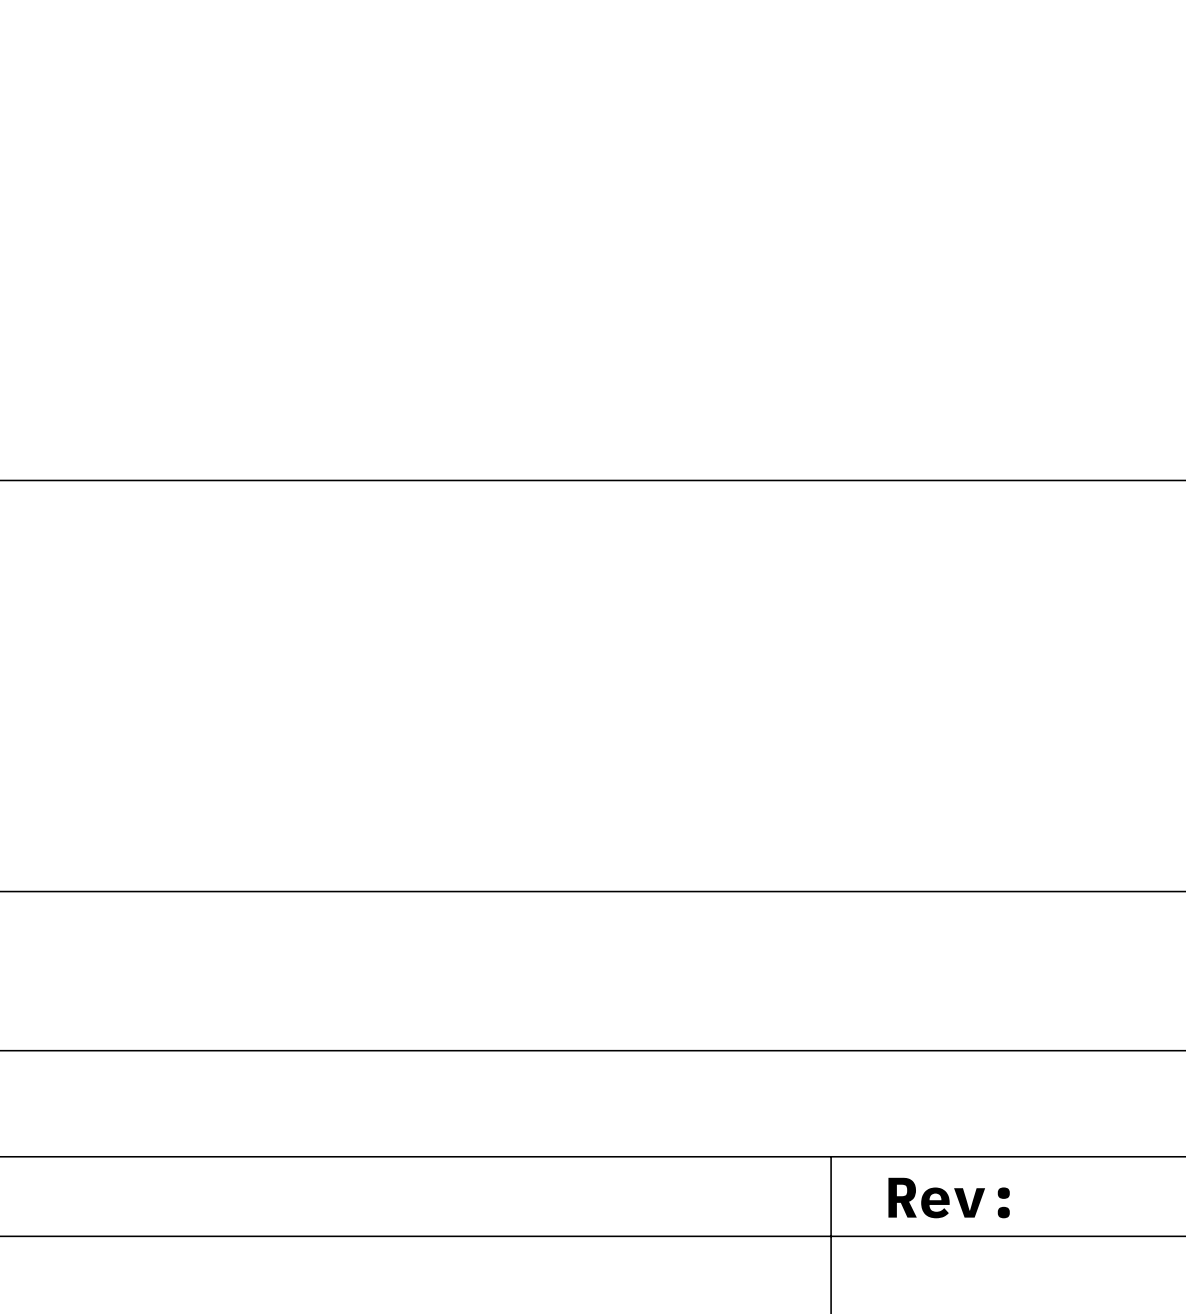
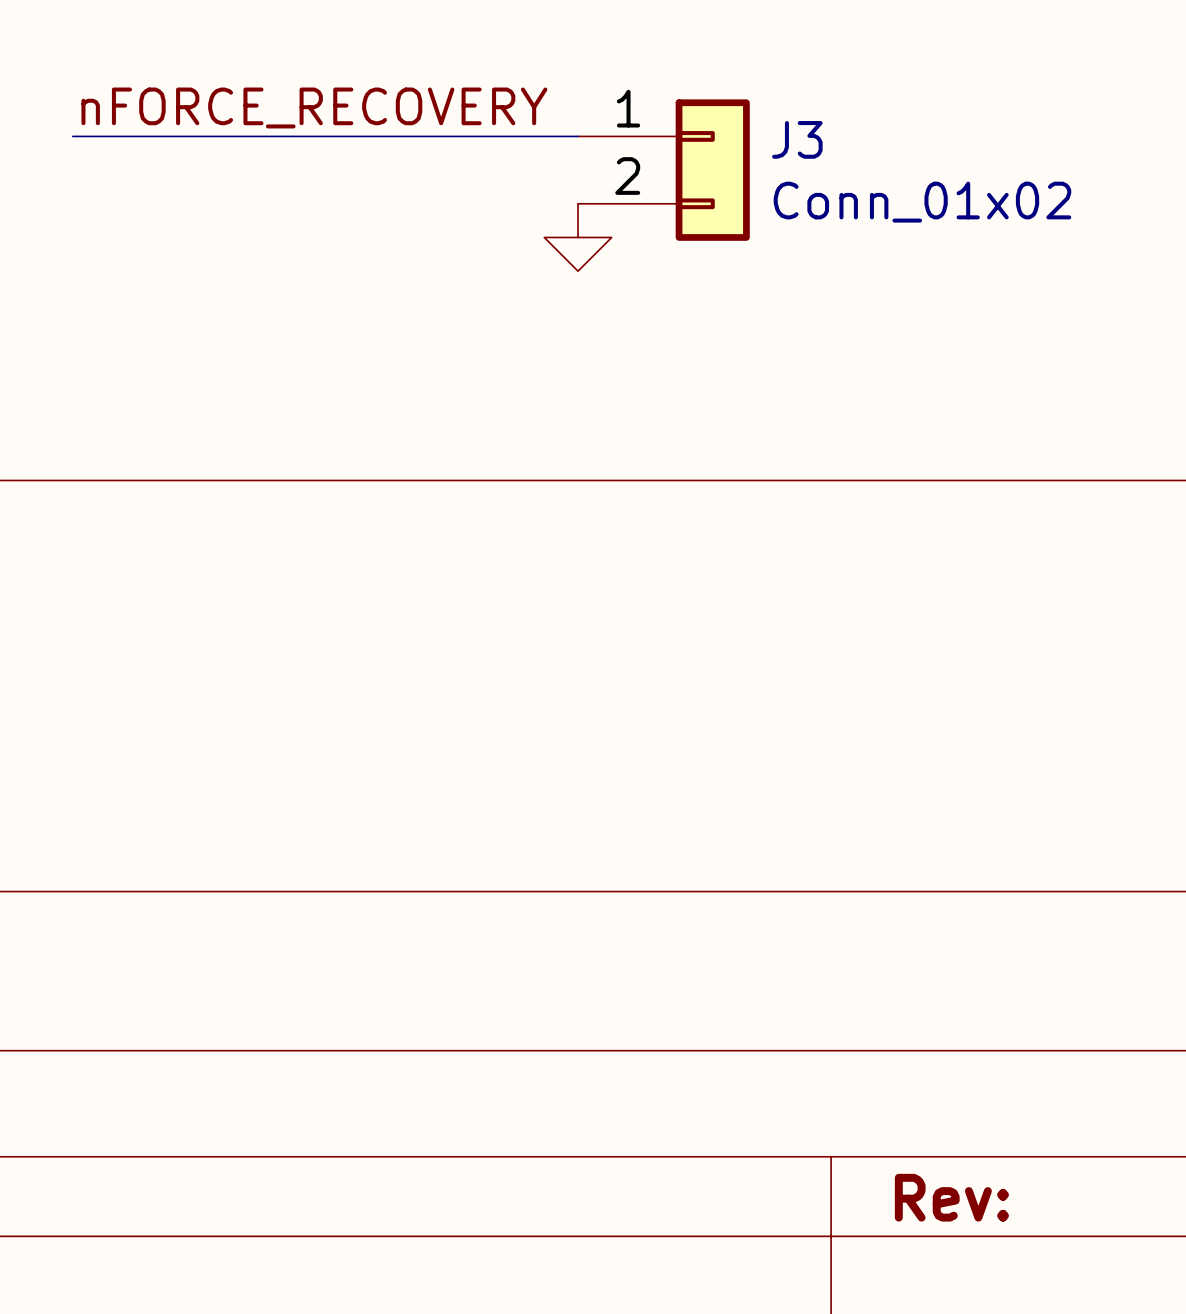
label: none -> nFORCE_RECOVERY (314, 107)
wire: none -> (72, 136) (578, 136)
J3: none -> Conn_01x02 (663, 170)
power symbol: none -> (578, 237)

